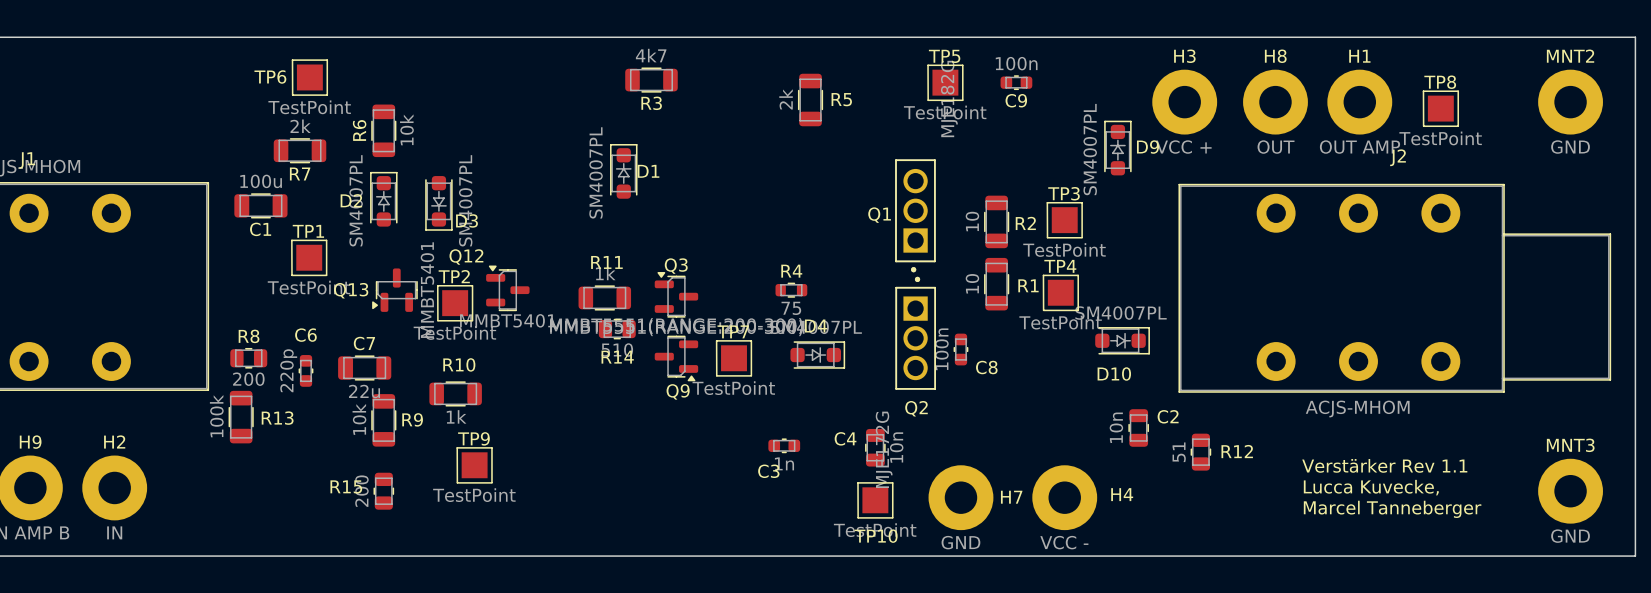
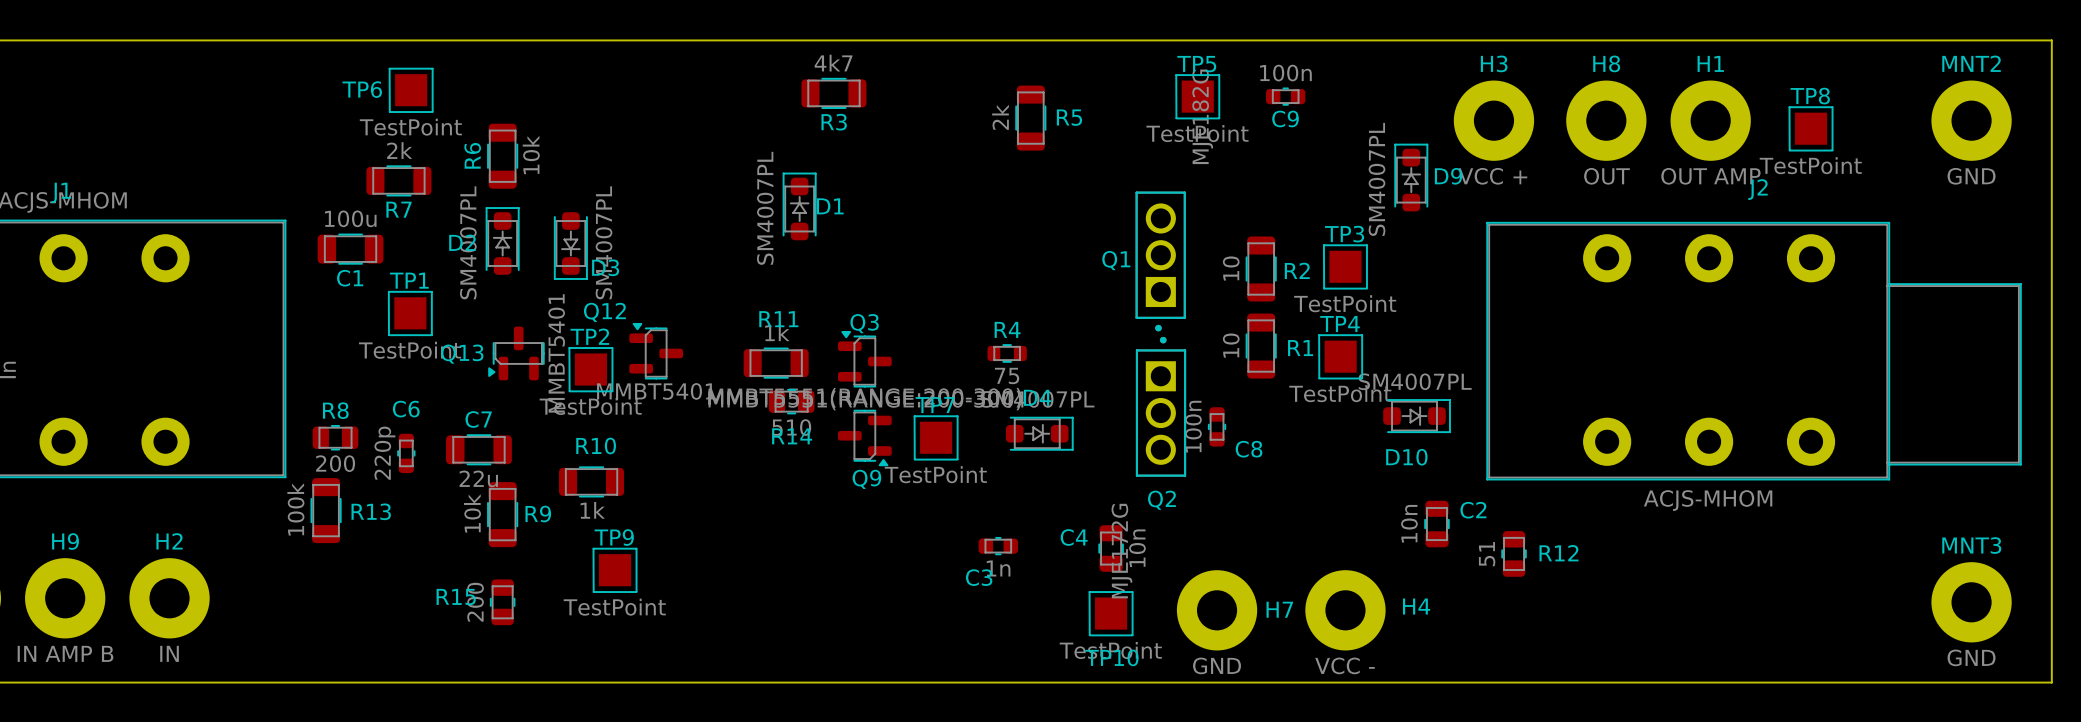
text: Verstärker Rev 1.1 (1384, 465) -> none
text: Lucca Kuvecke, (1371, 487) -> none
text: Marcel Tanneberger (1392, 509) -> none

